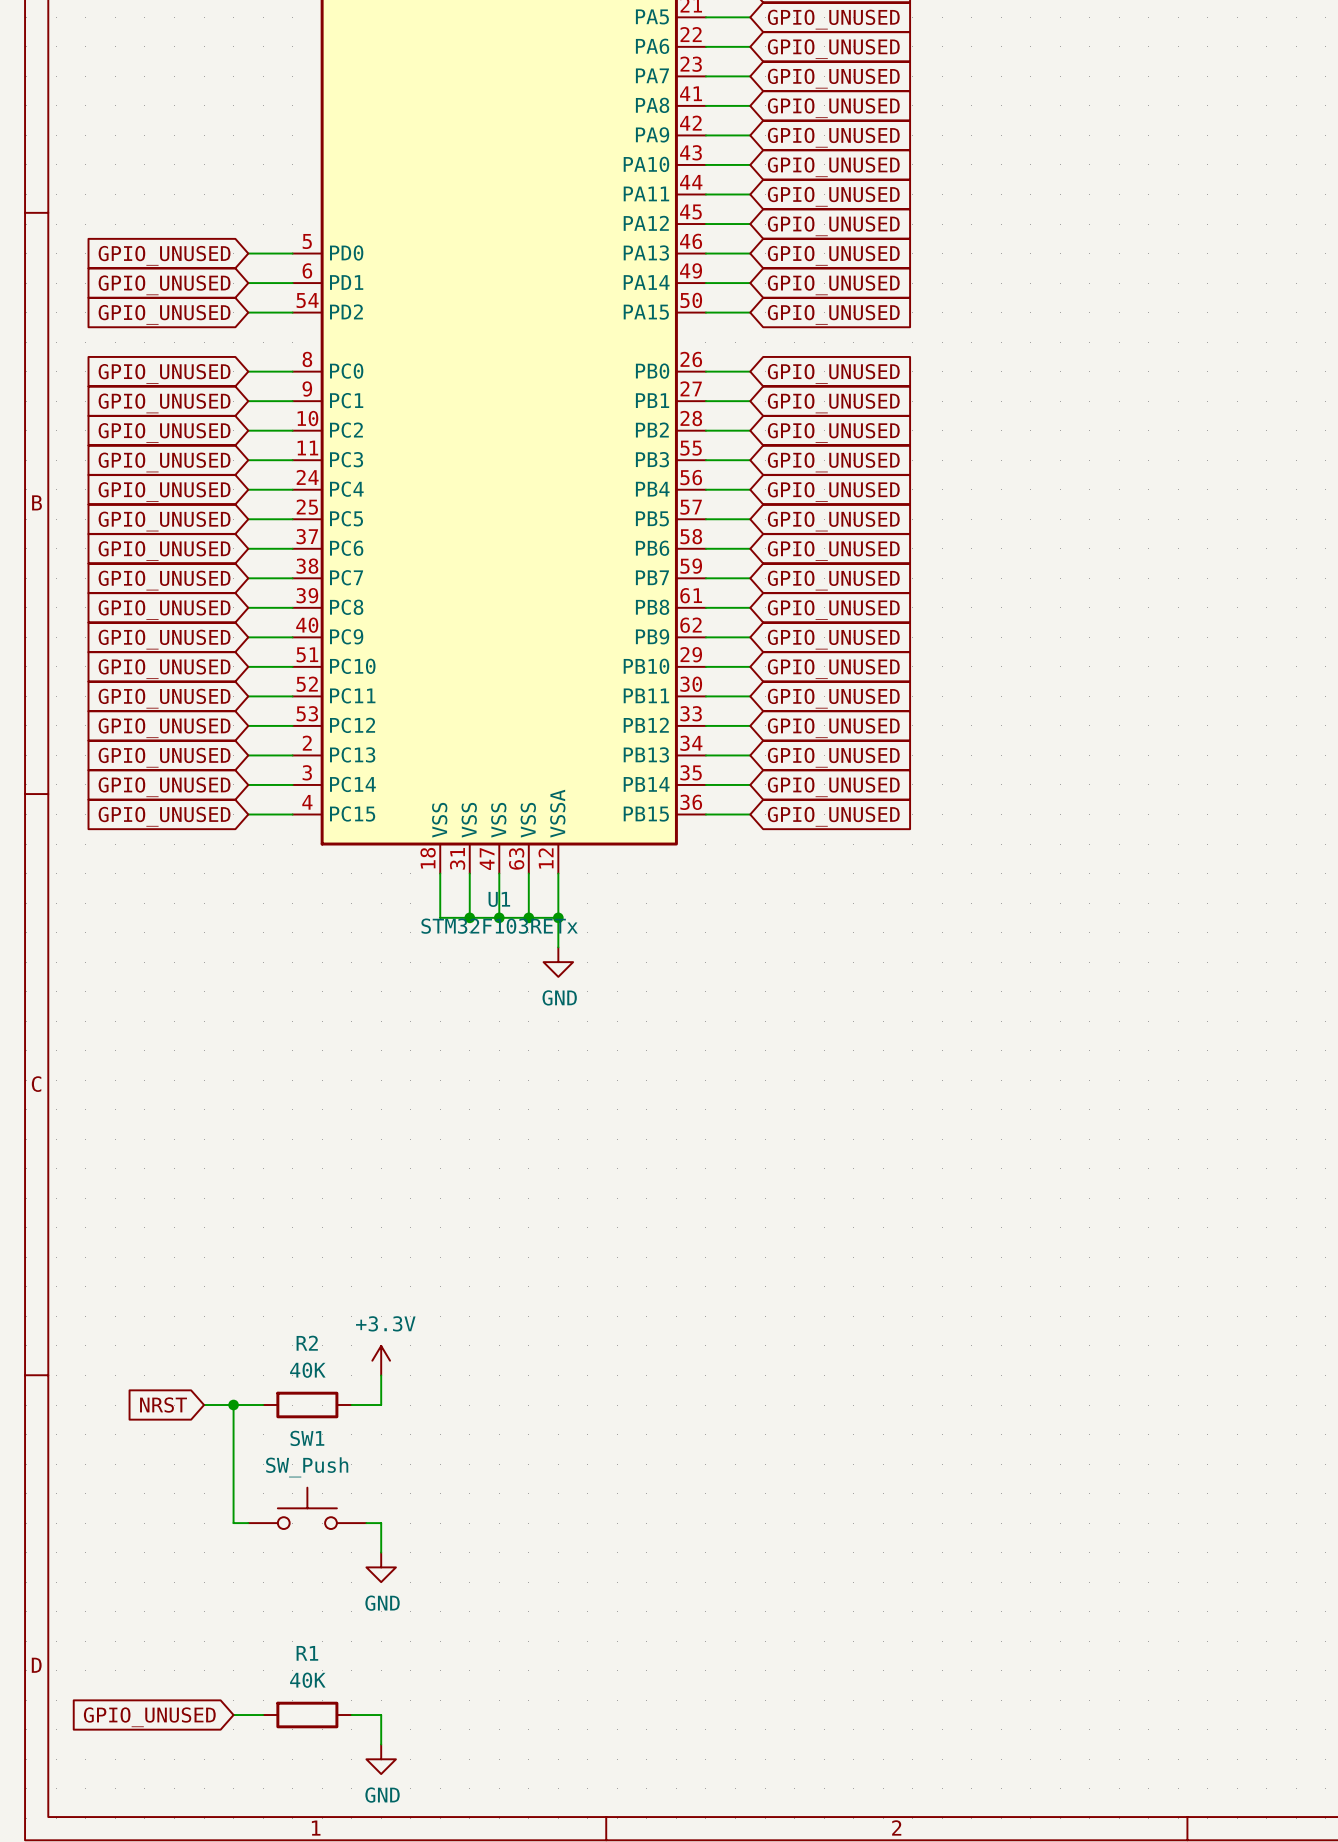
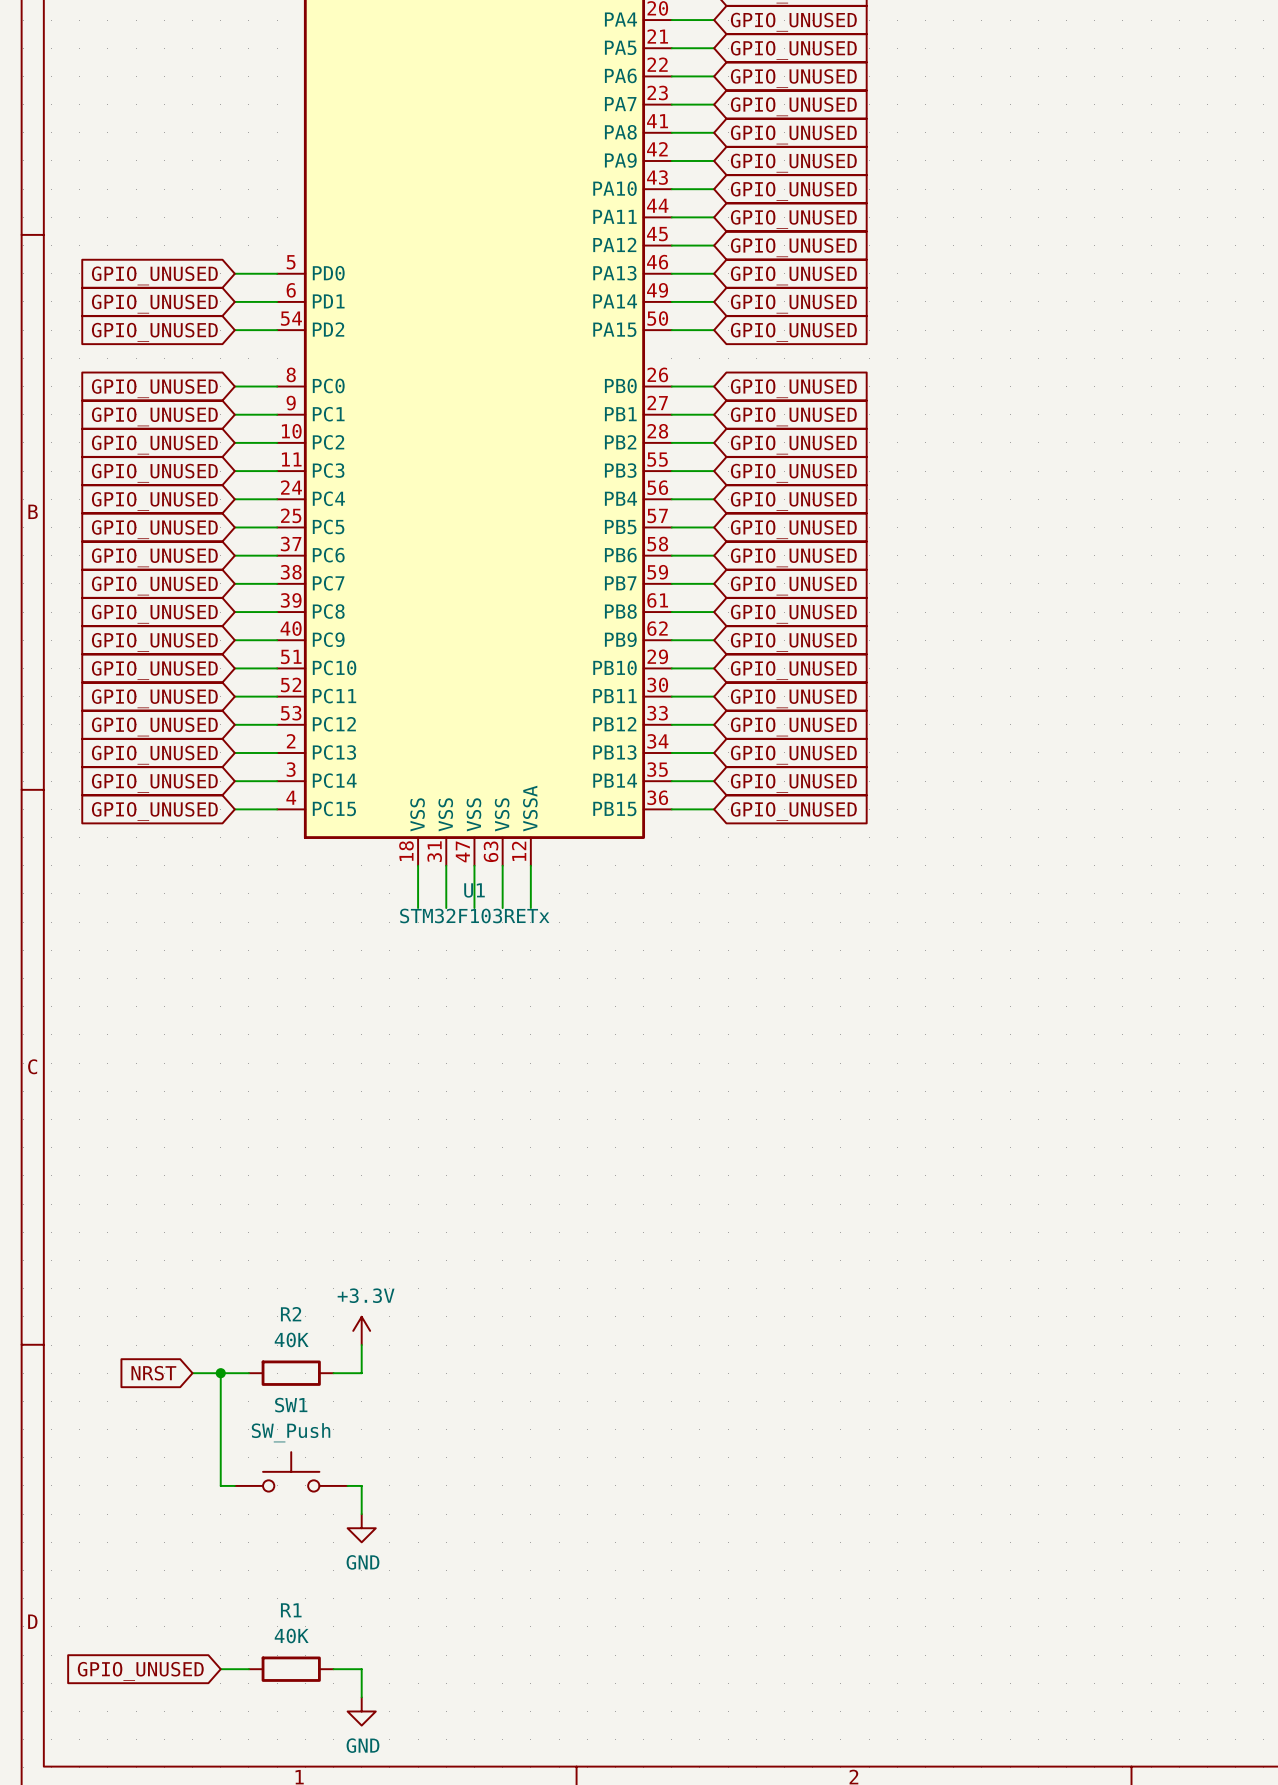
wire: (440, 917) (558, 917) (558, 947) -> none
junction: (469, 917) -> none
junction: (499, 917) -> none
junction: (528, 917) -> none
junction: (558, 917) -> none
power symbol: GND (558, 962) -> none

